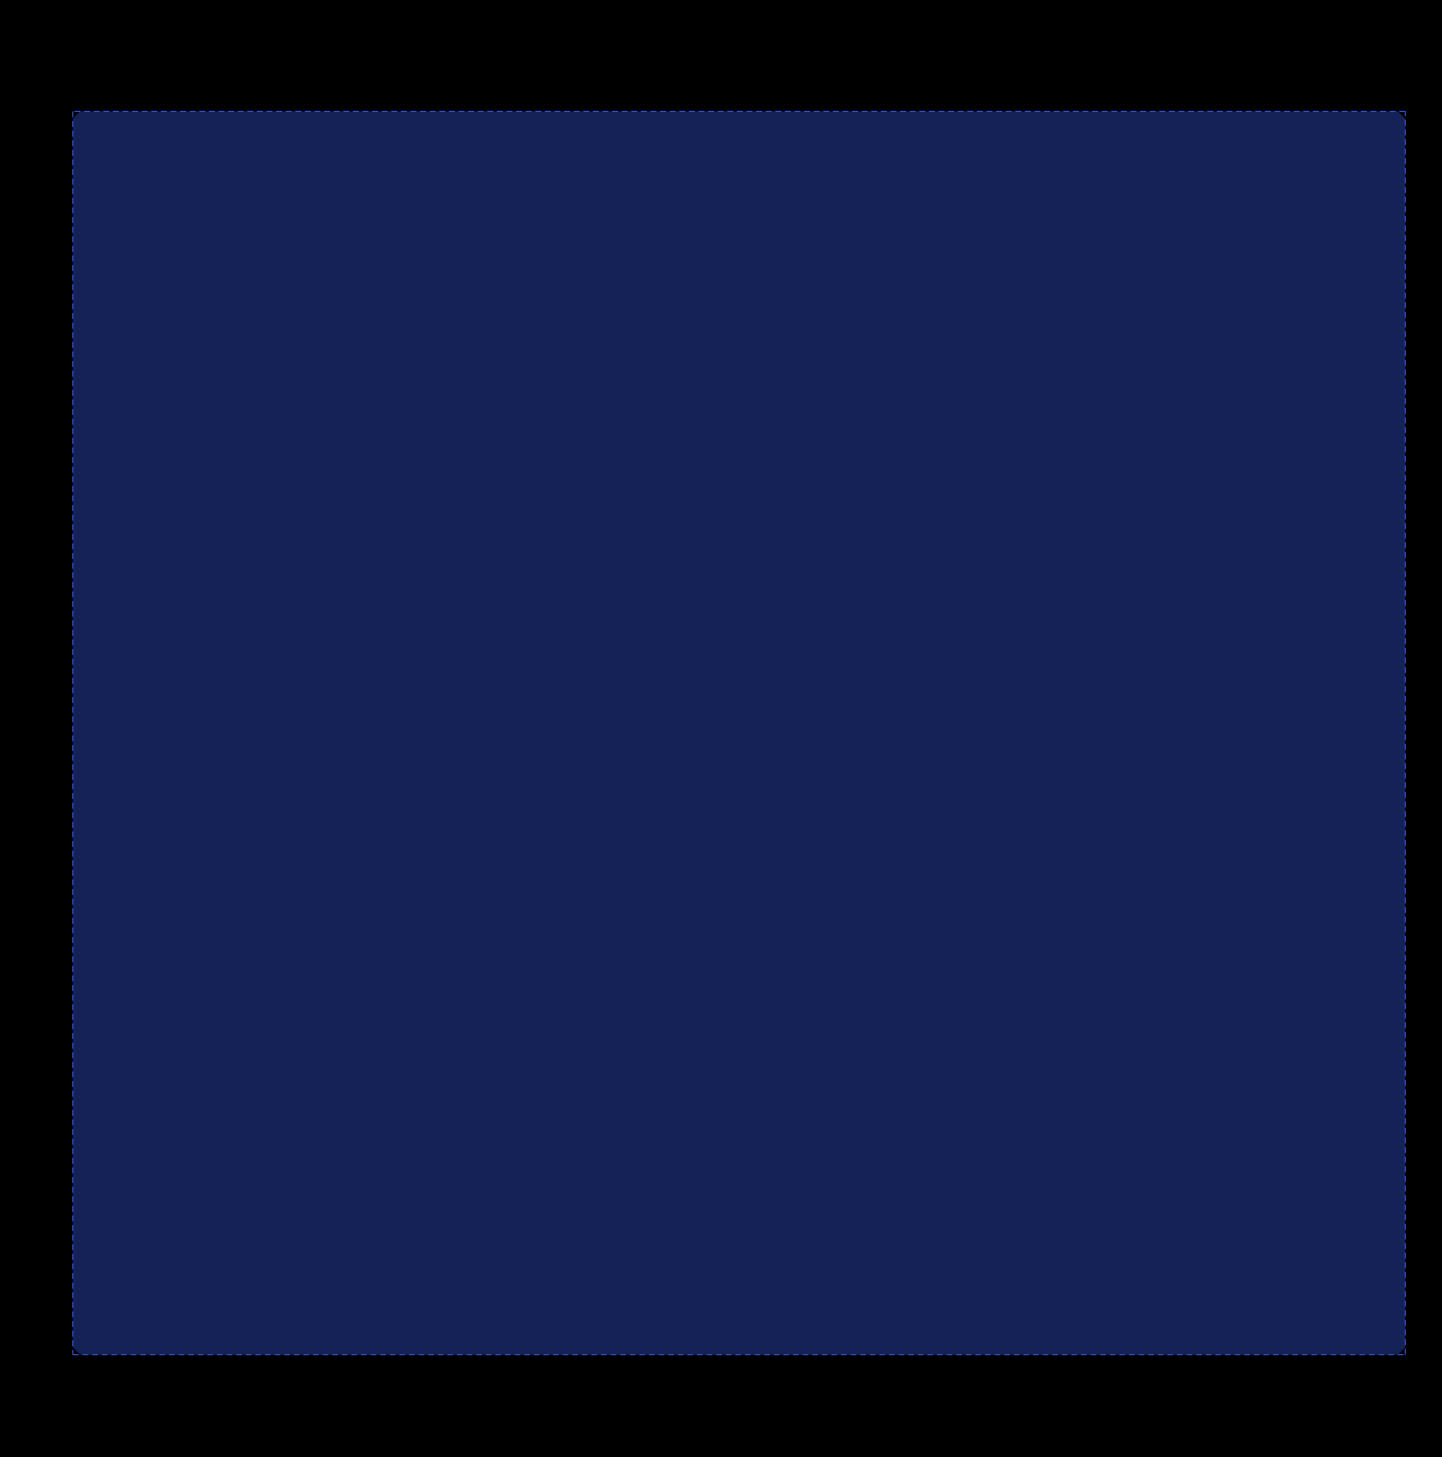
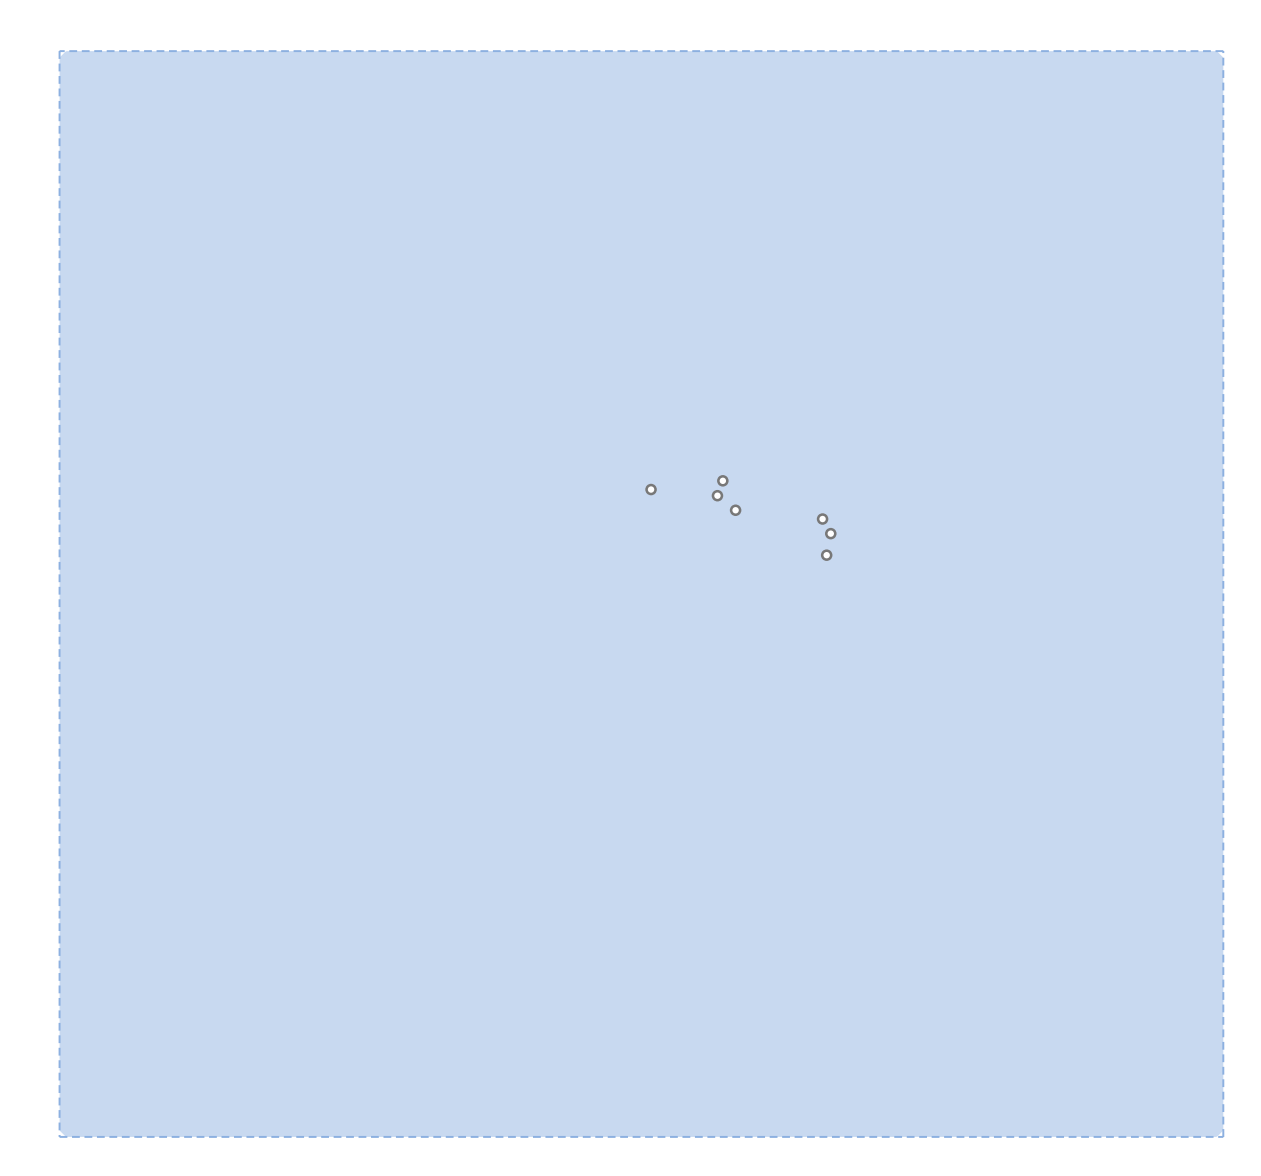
via: none -> (722, 480)
via: none -> (651, 489)
via: none -> (717, 495)
via: none -> (735, 510)
via: none -> (822, 519)
via: none -> (830, 533)
via: none -> (826, 555)

